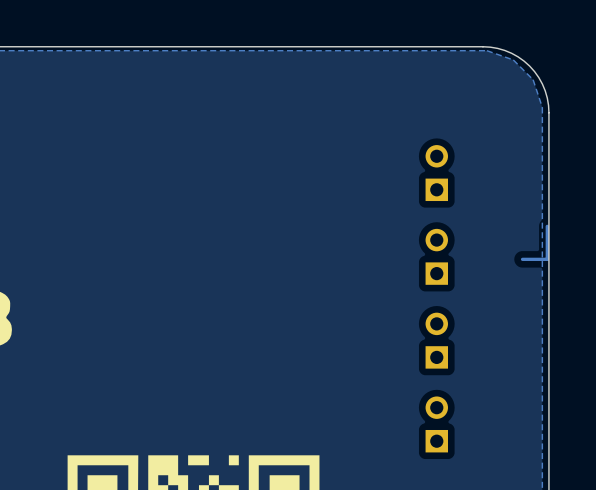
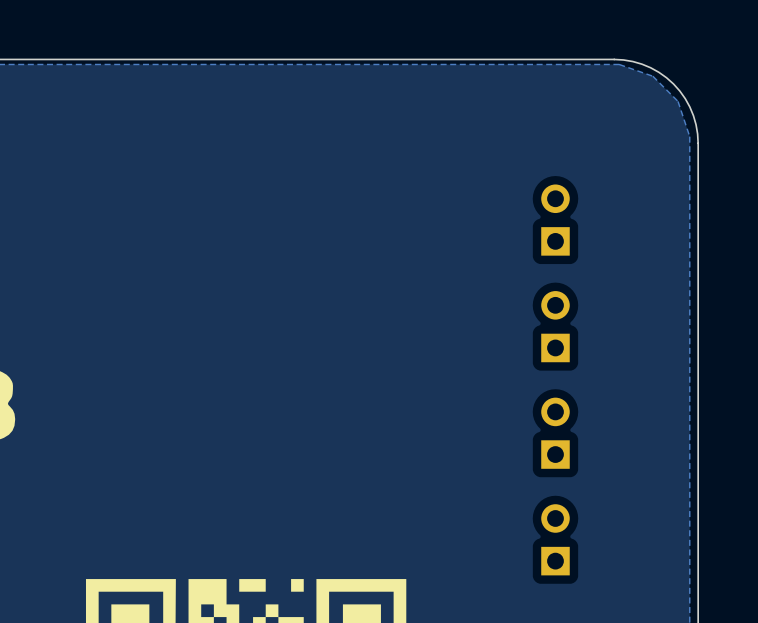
track: (547, 226) (547, 259) (522, 259) -> none

